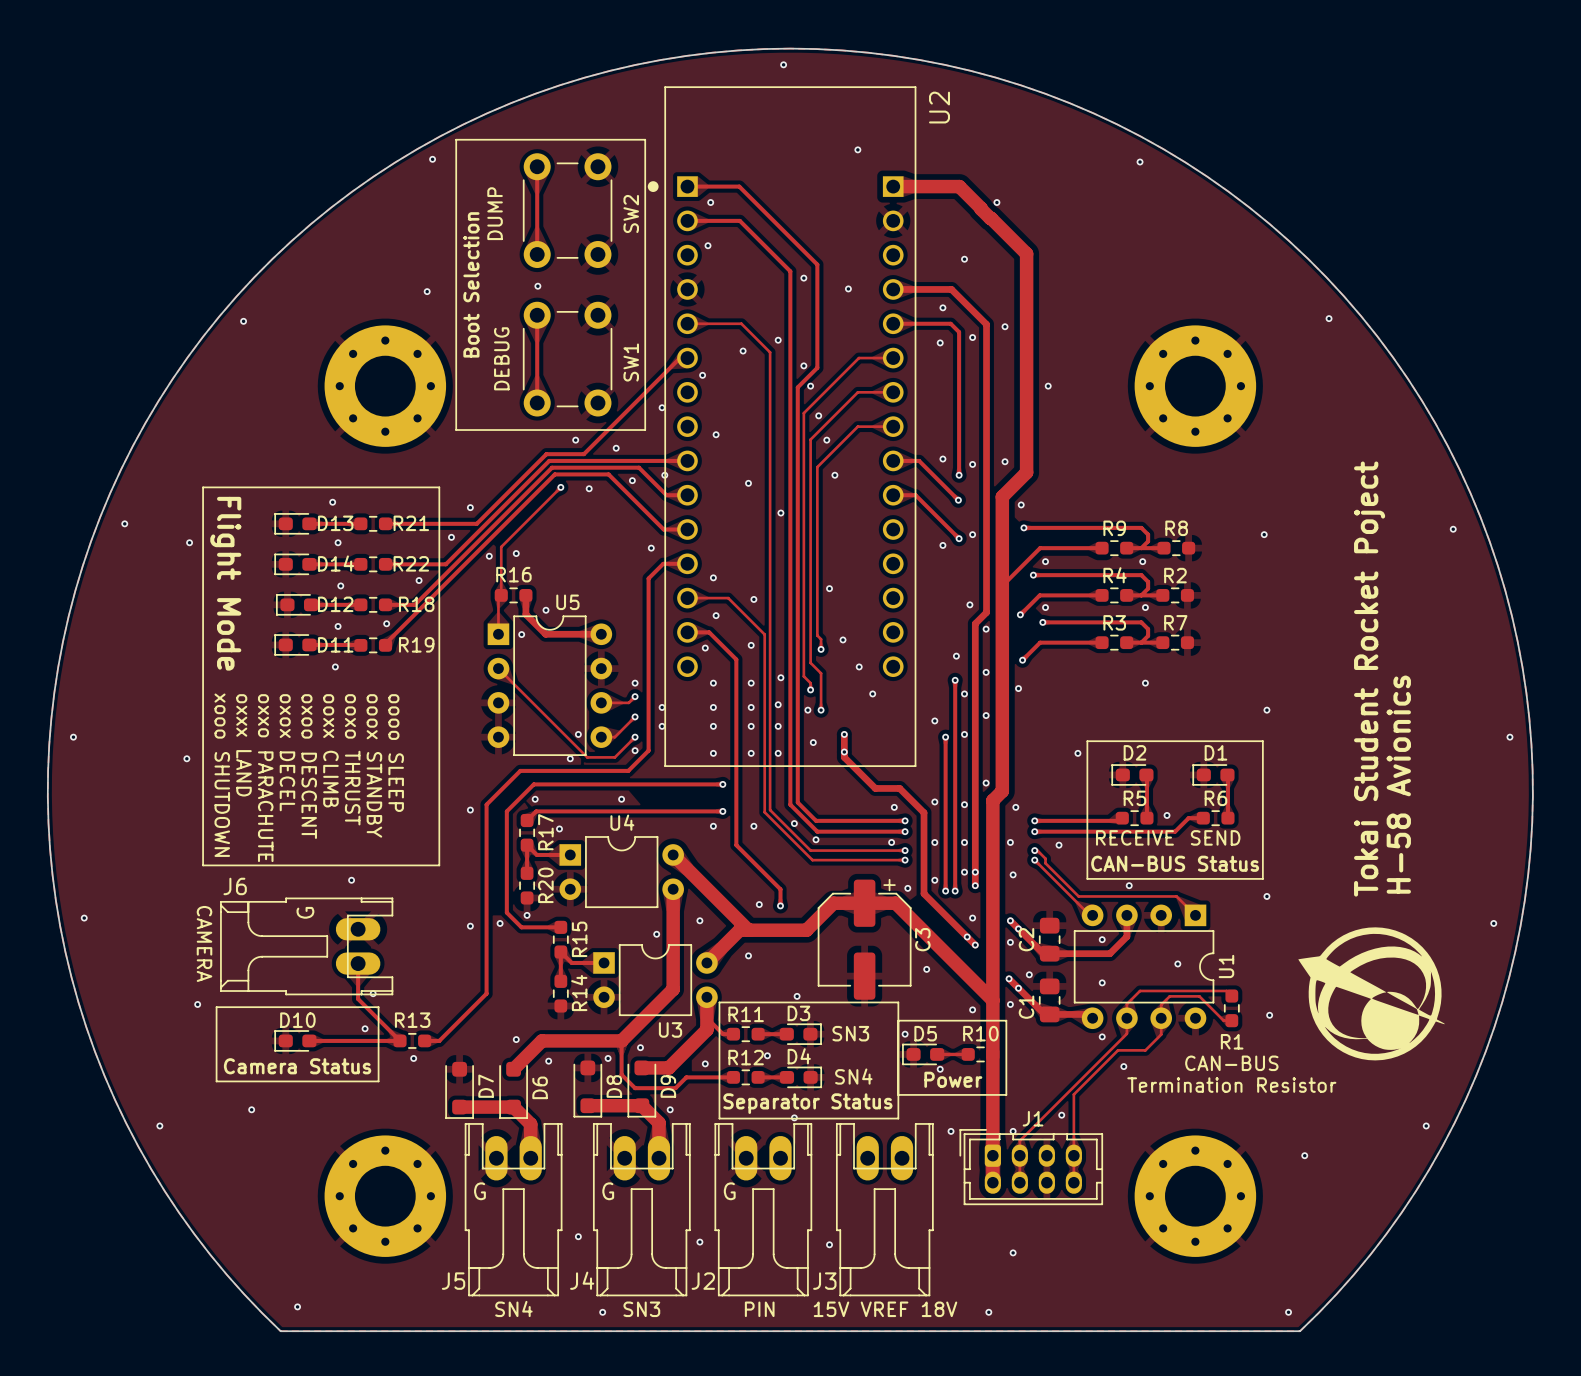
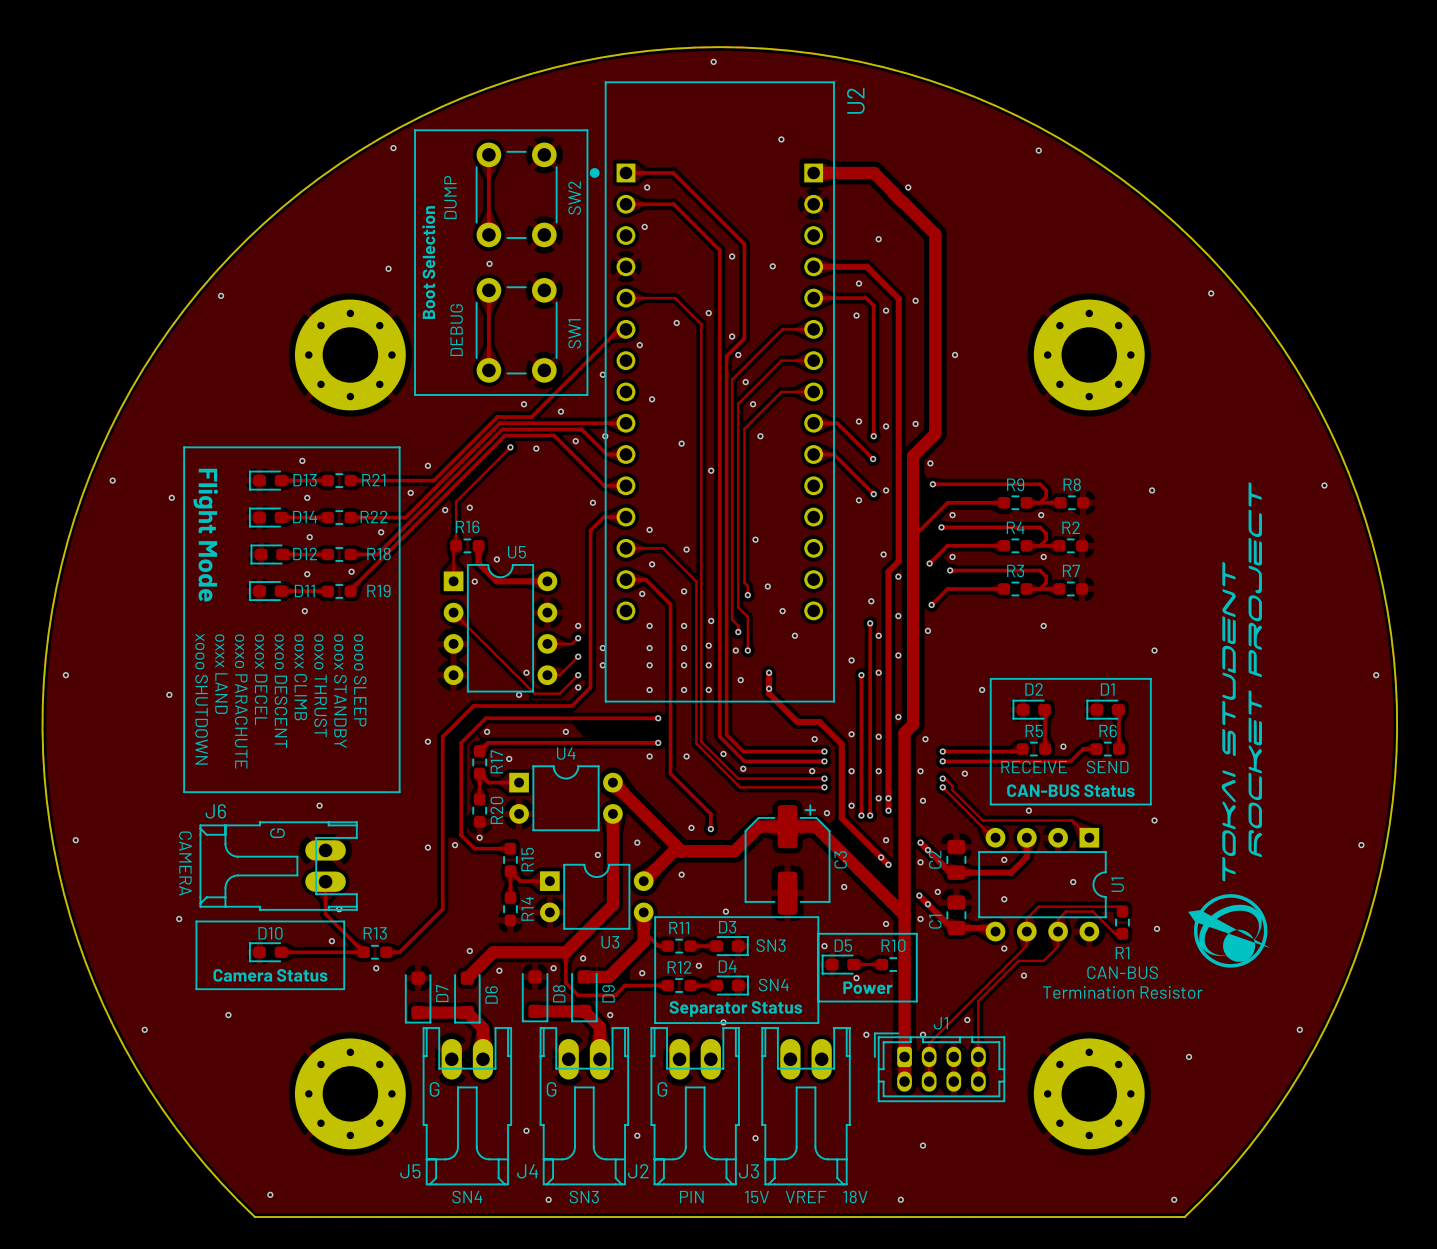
drawing: none -> [1188, 482, 1270, 968]
text: Tokai Student Rocket Poject (1369, 679) -> none
text: H-58 Avionics (1398, 784) -> none
drawing: [1298, 927, 1445, 1061] -> none

